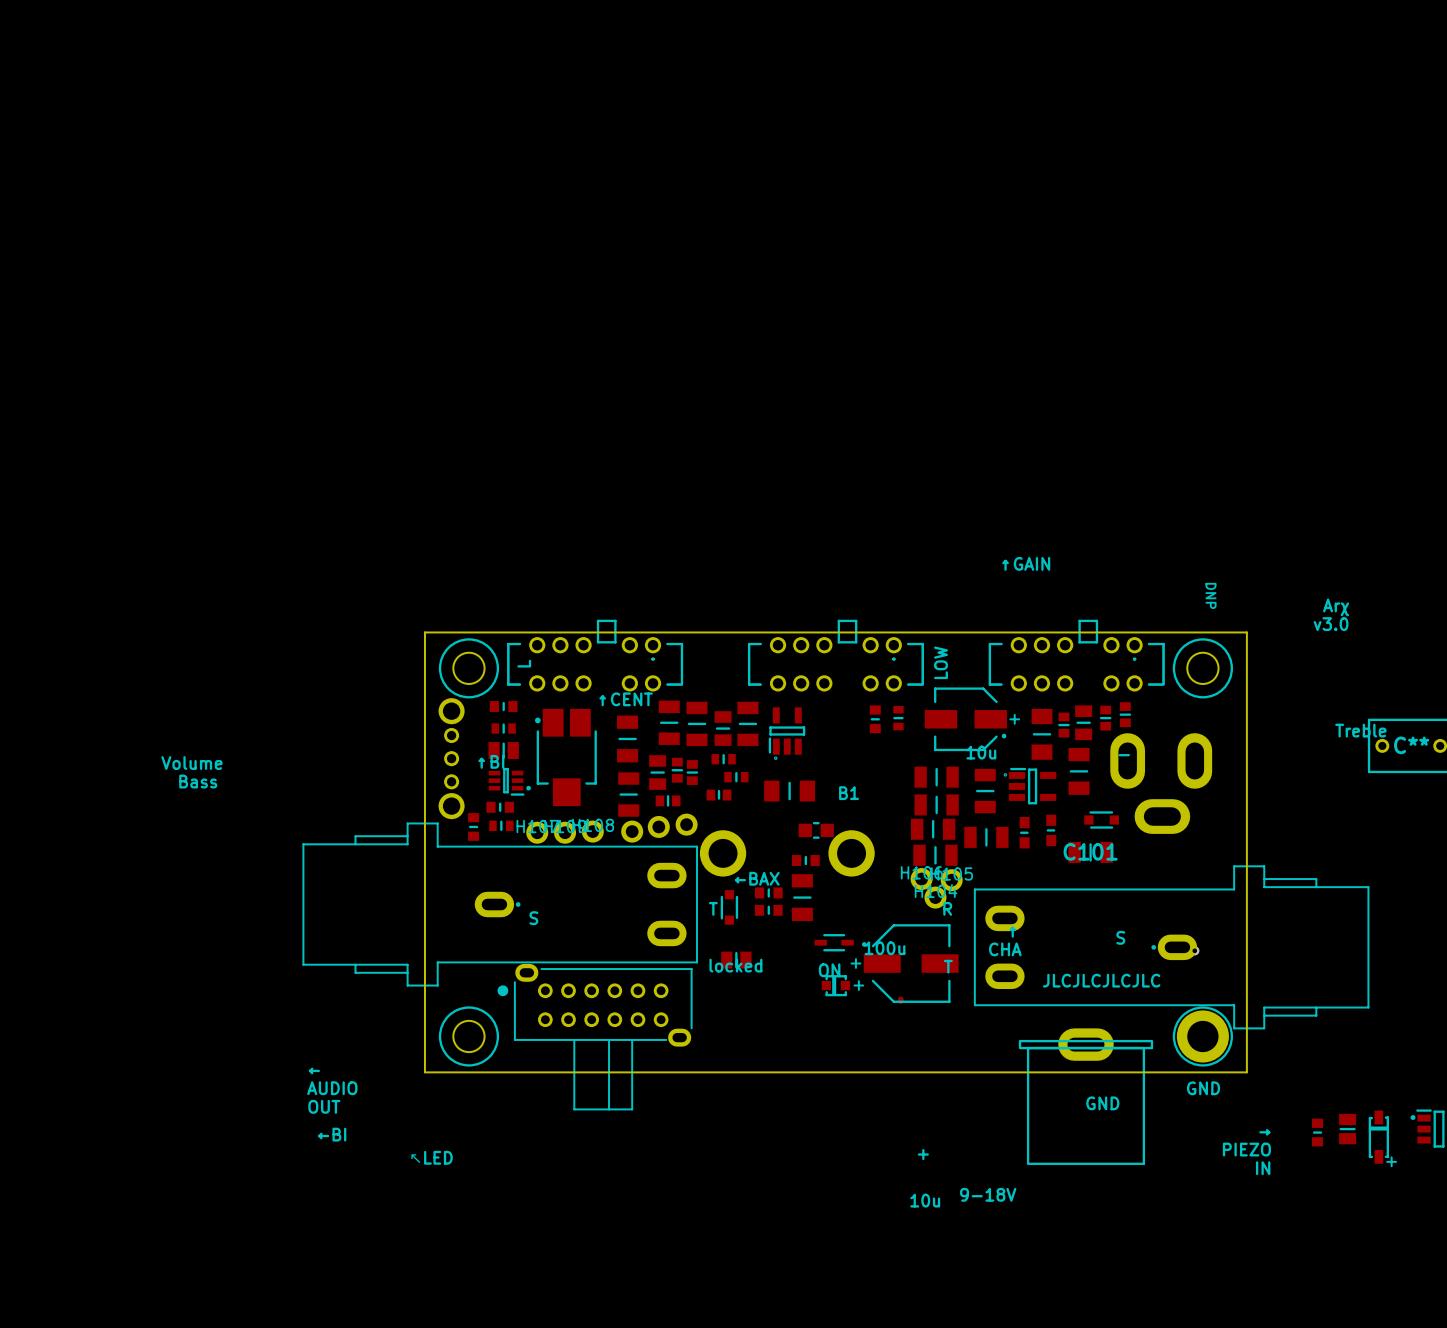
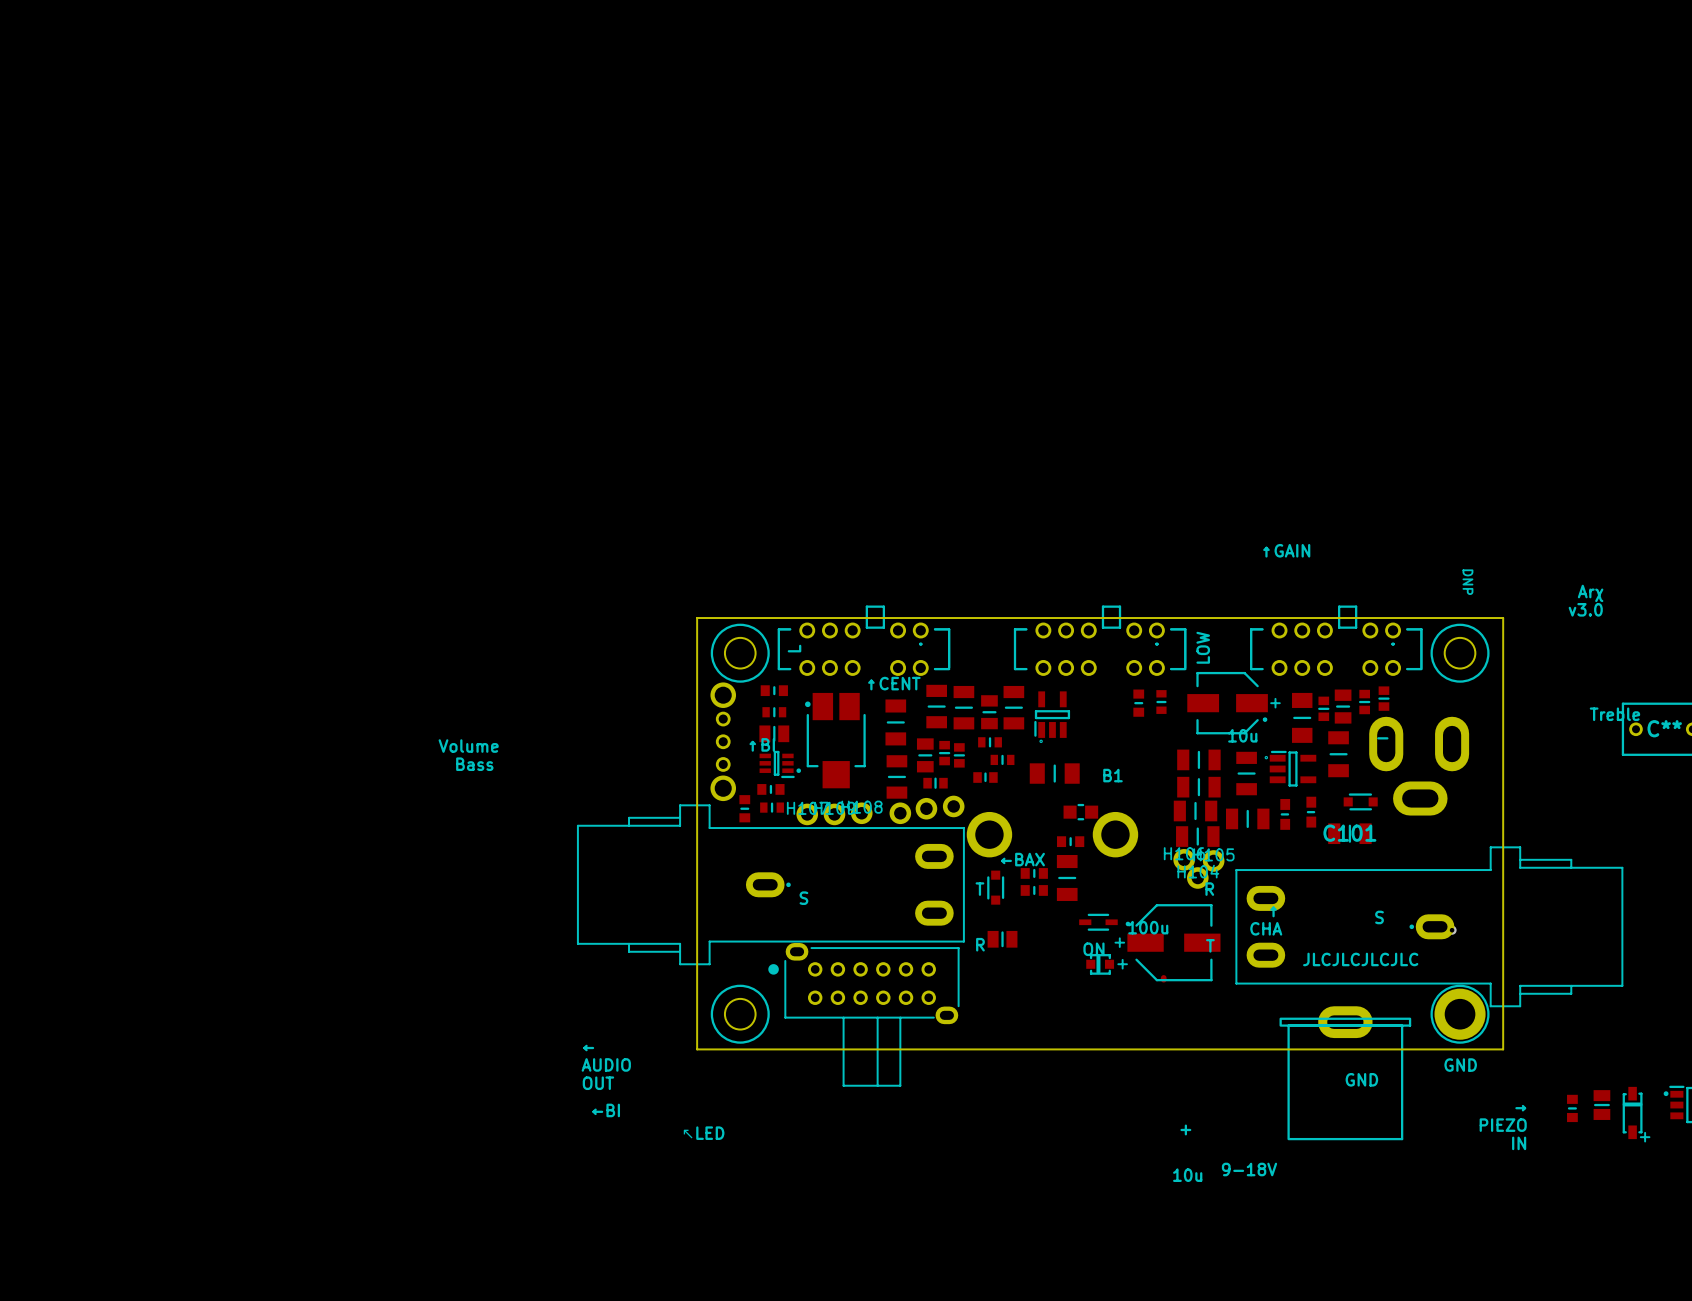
text: locked (735, 965) -> R (980, 944)

